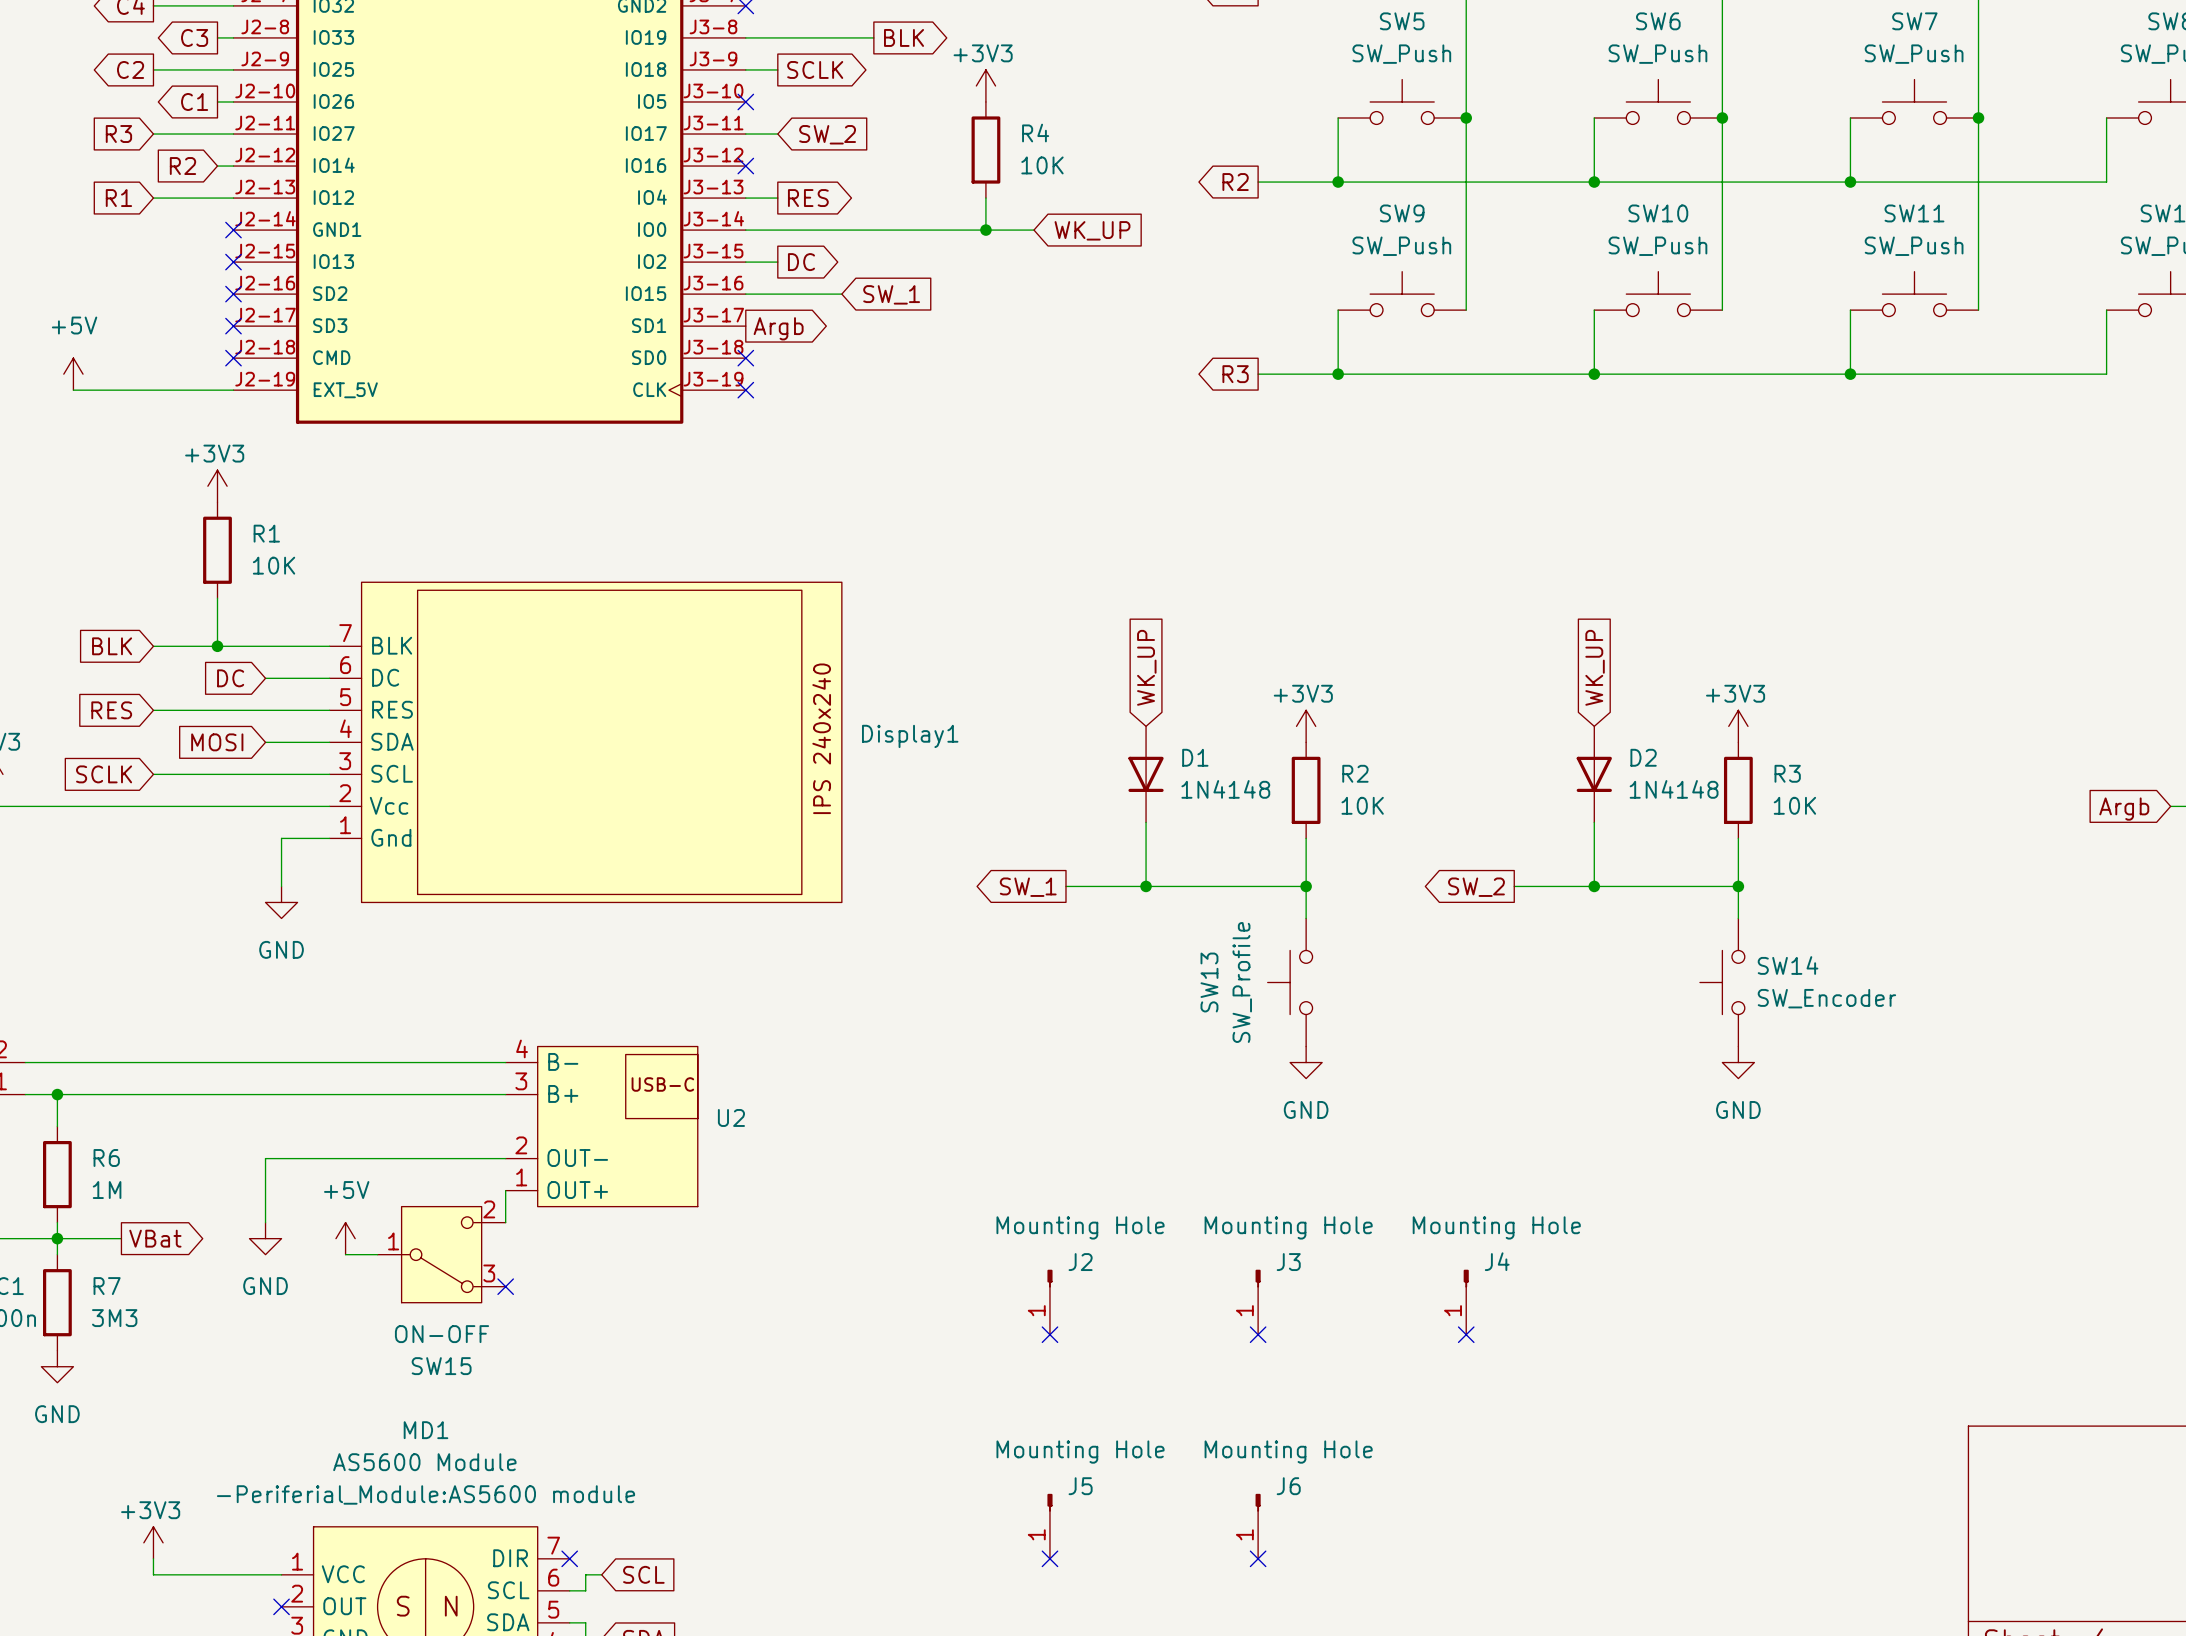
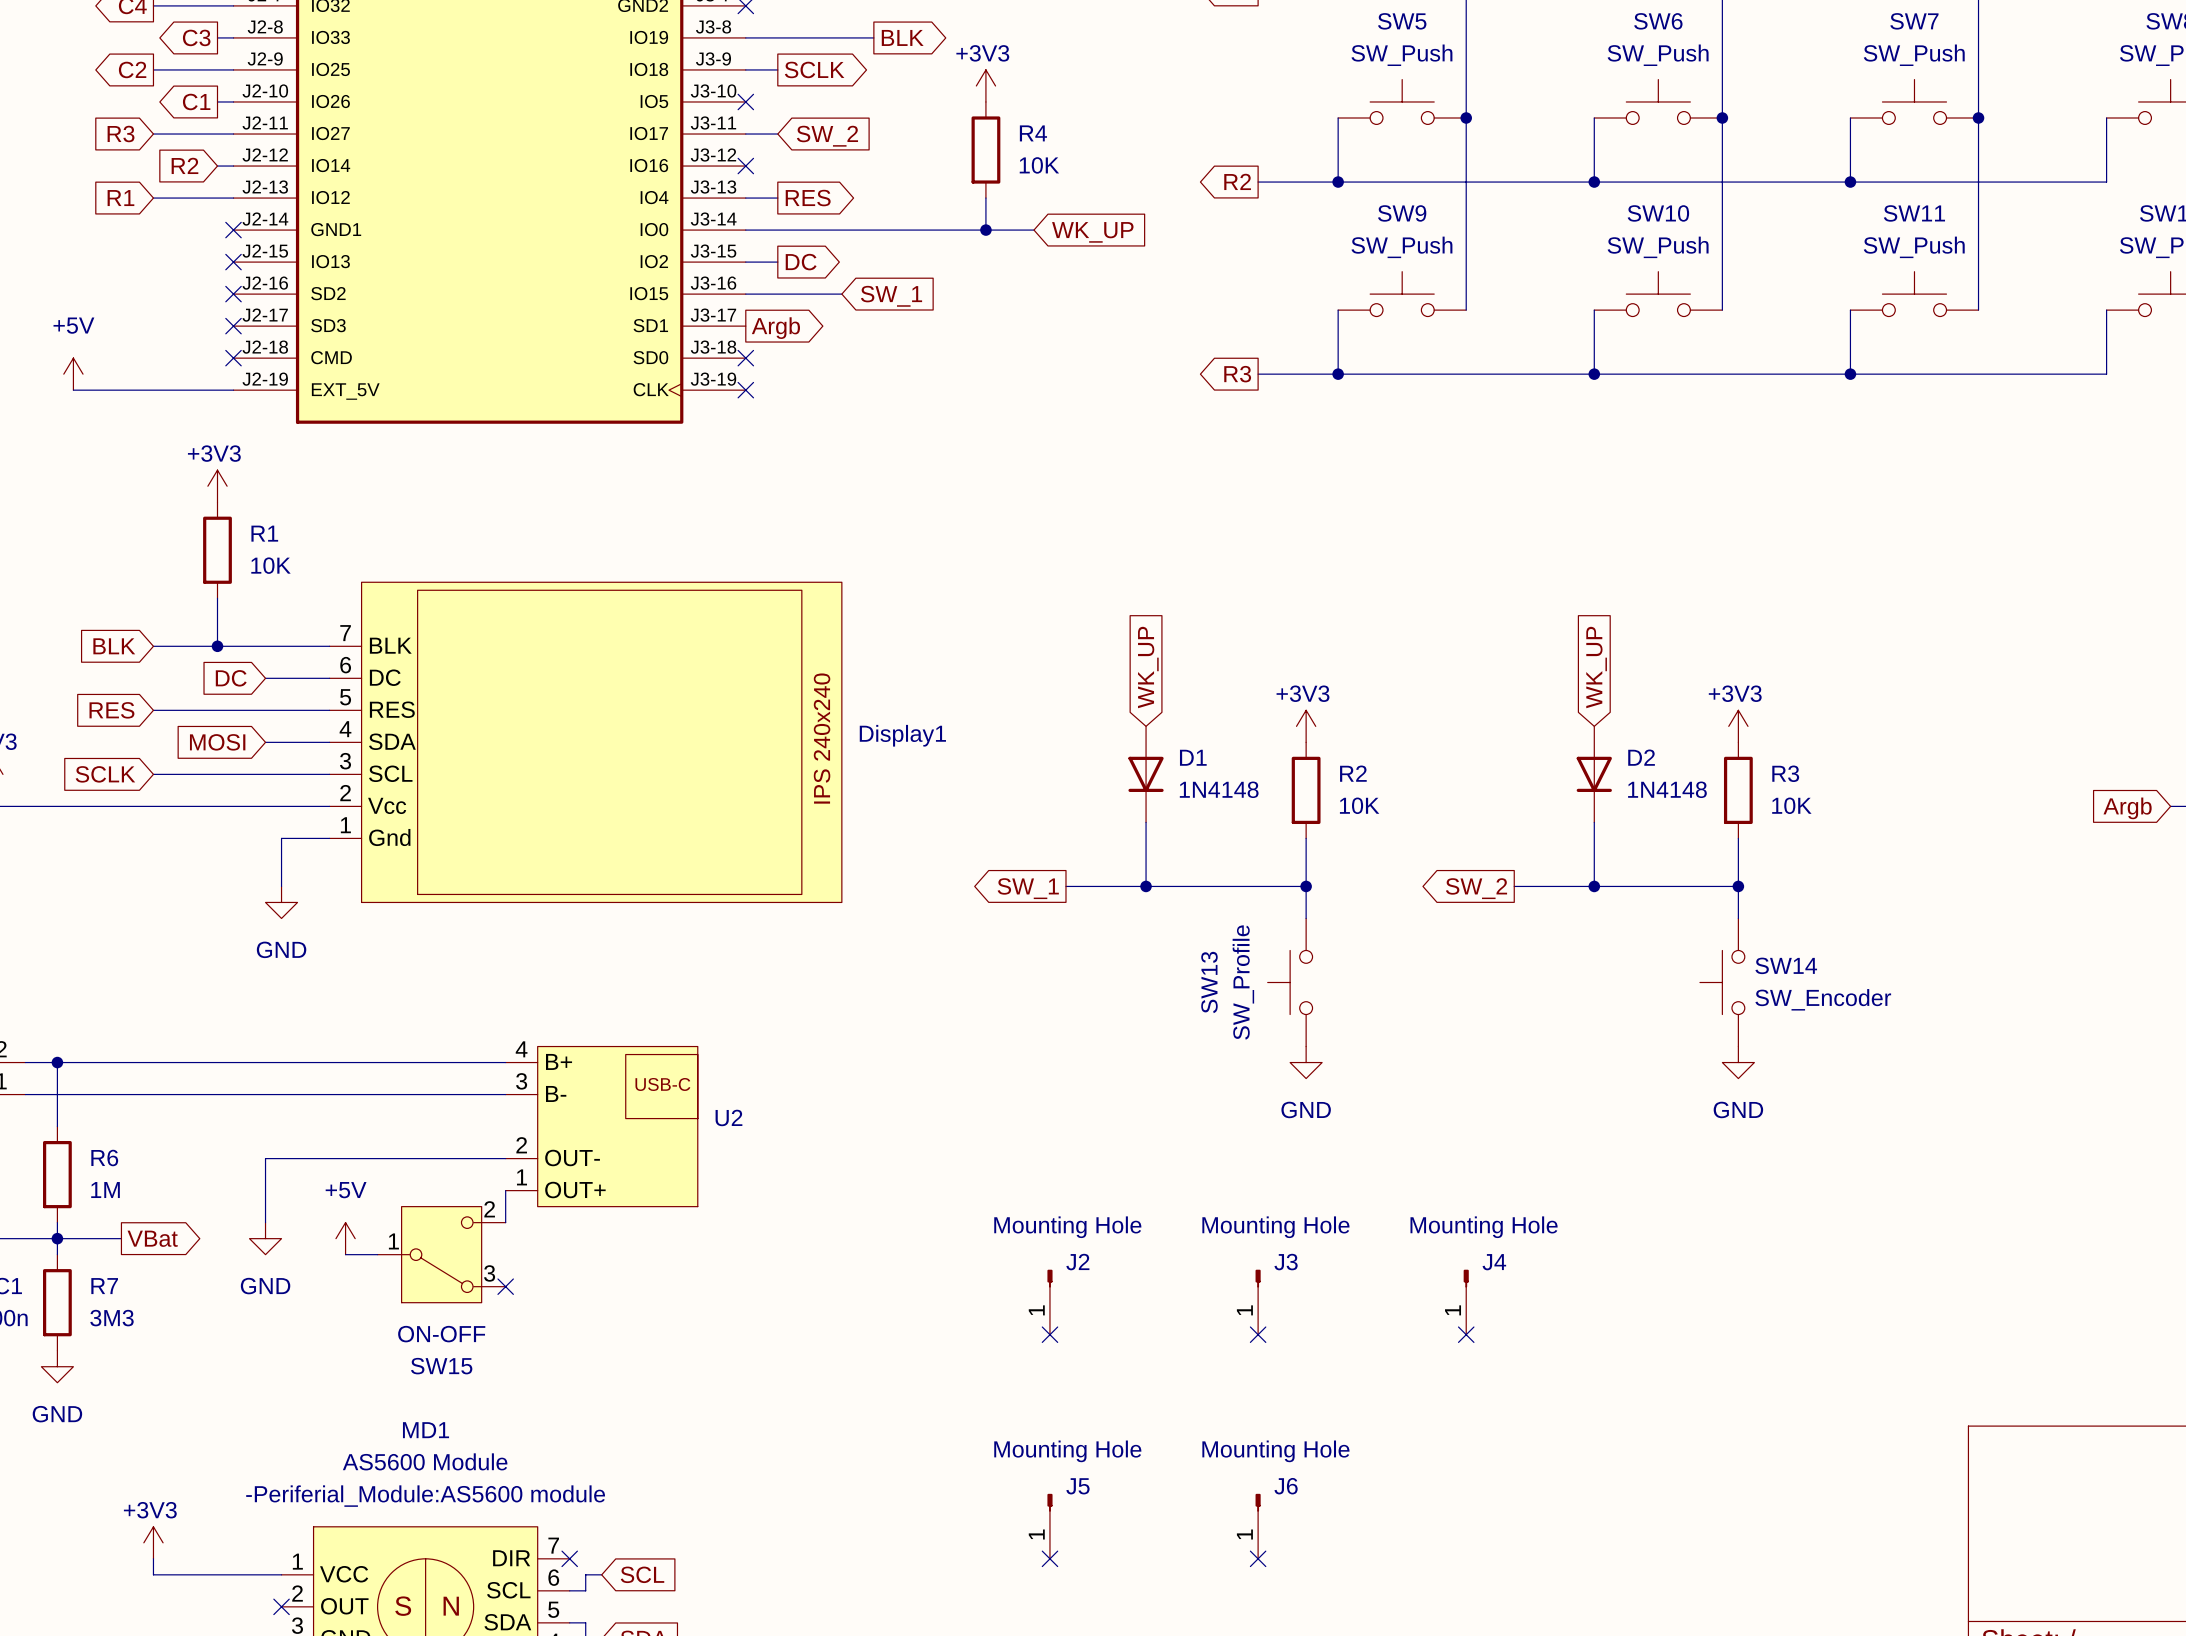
U2 pin name: B- (563, 1061) -> B+ (559, 1061)
wire: none -> (57, 1062) (57, 1094)
U2 pin name: B+ (563, 1093) -> B- (556, 1093)
junction position: (57, 1094) -> (57, 1062)

